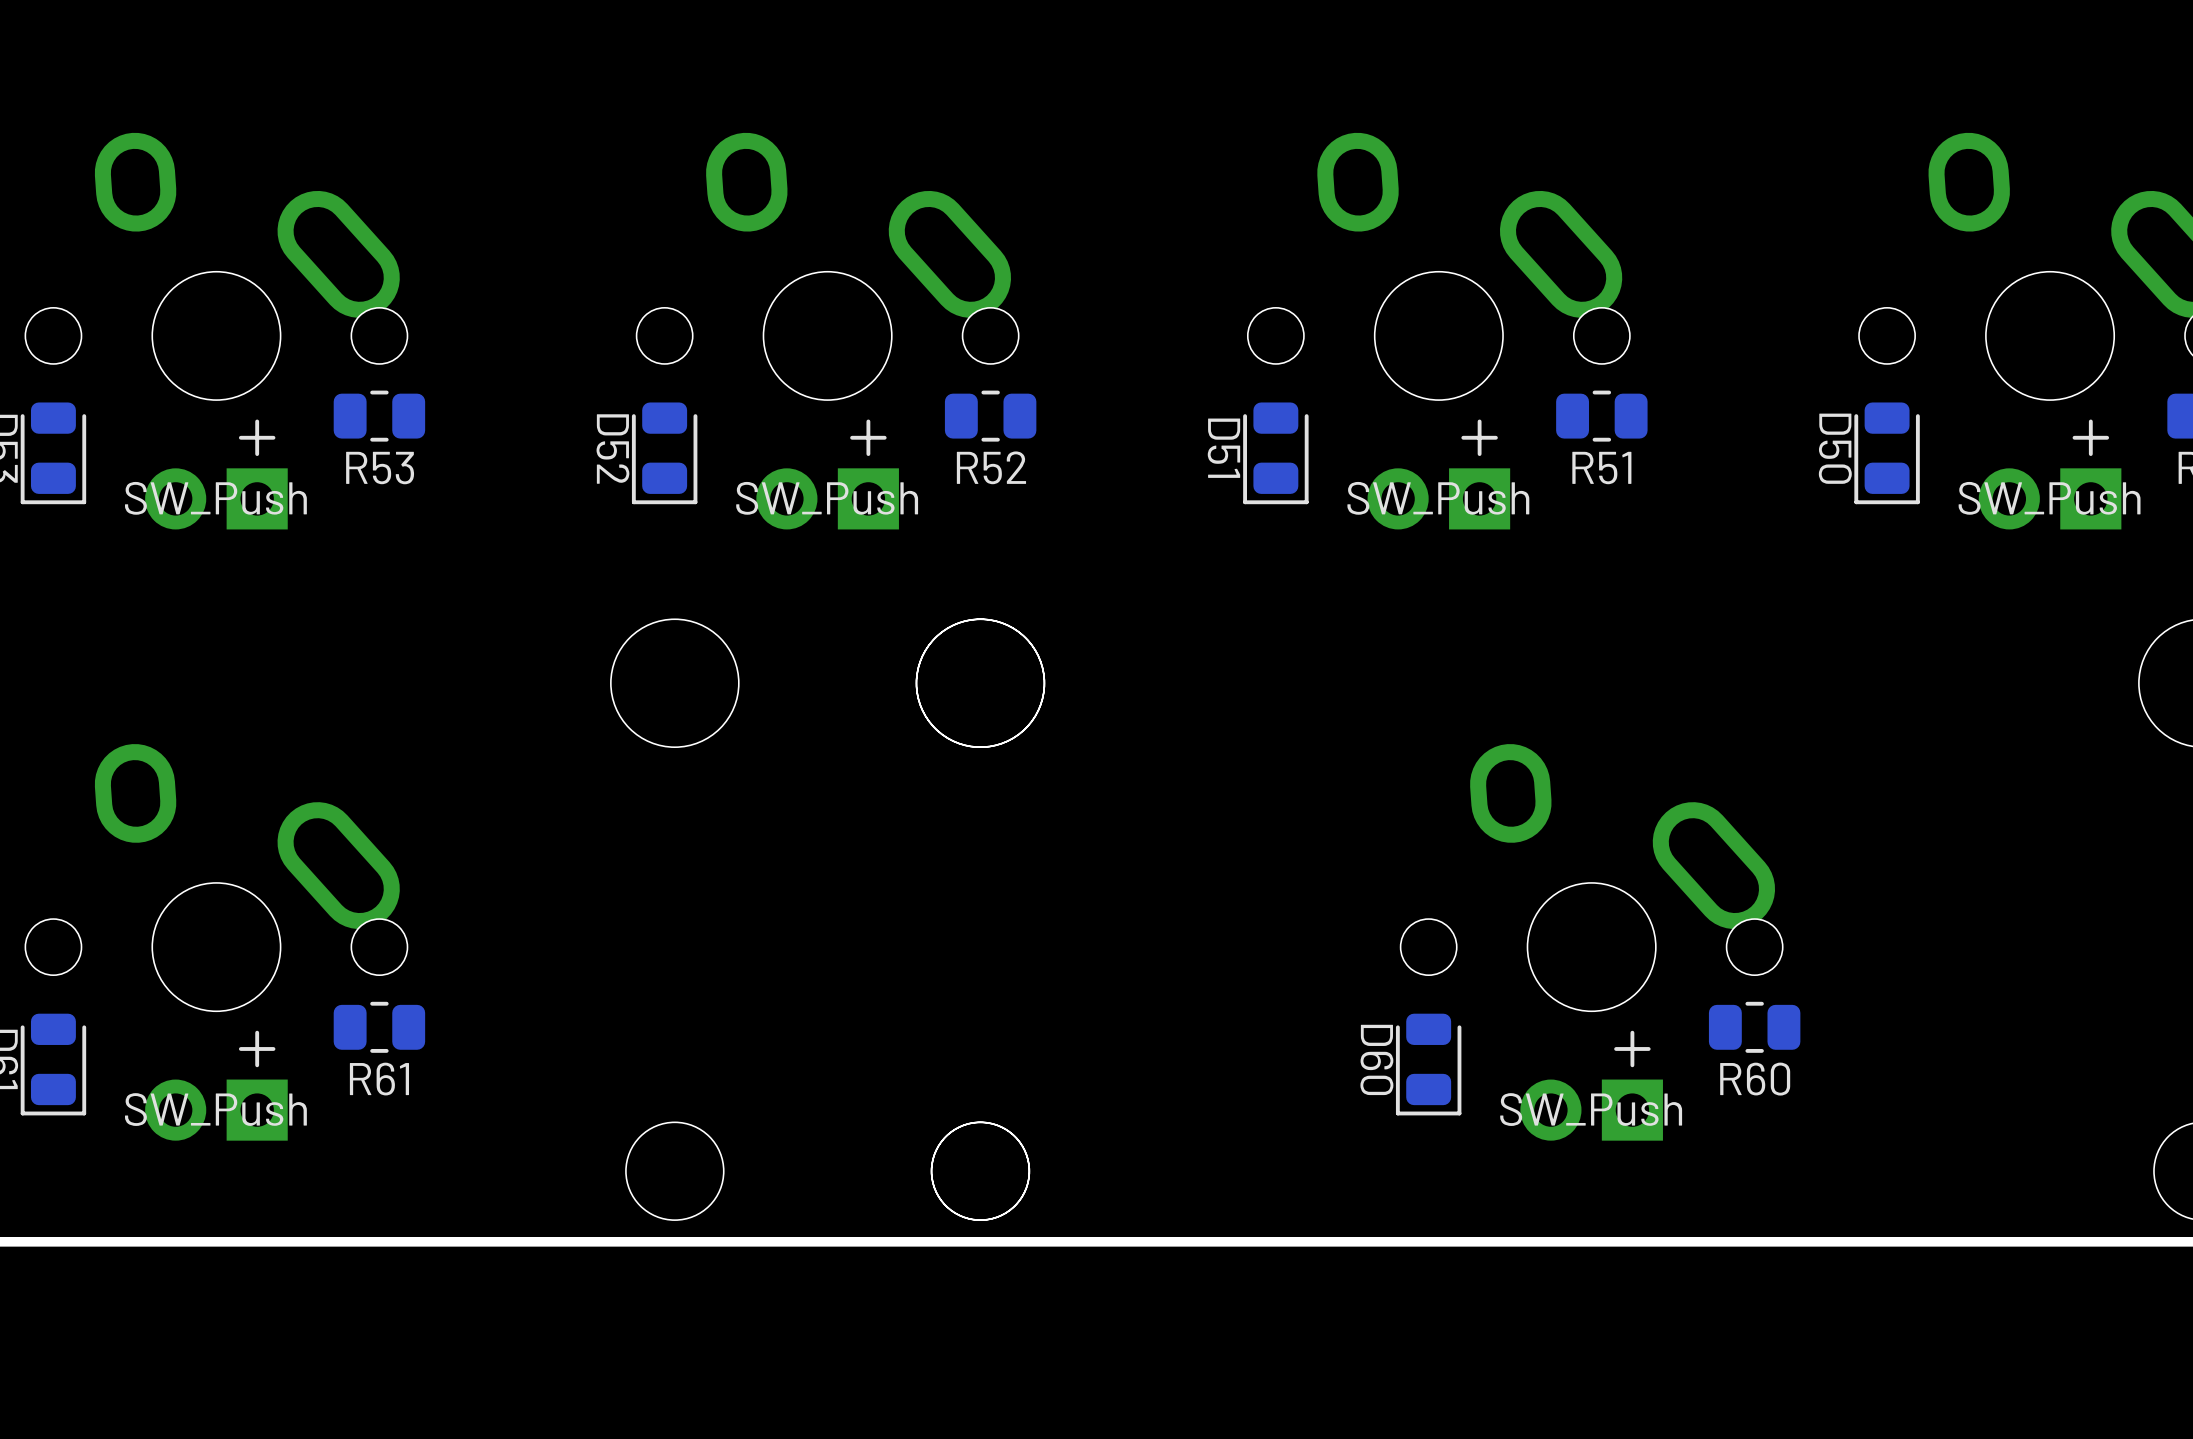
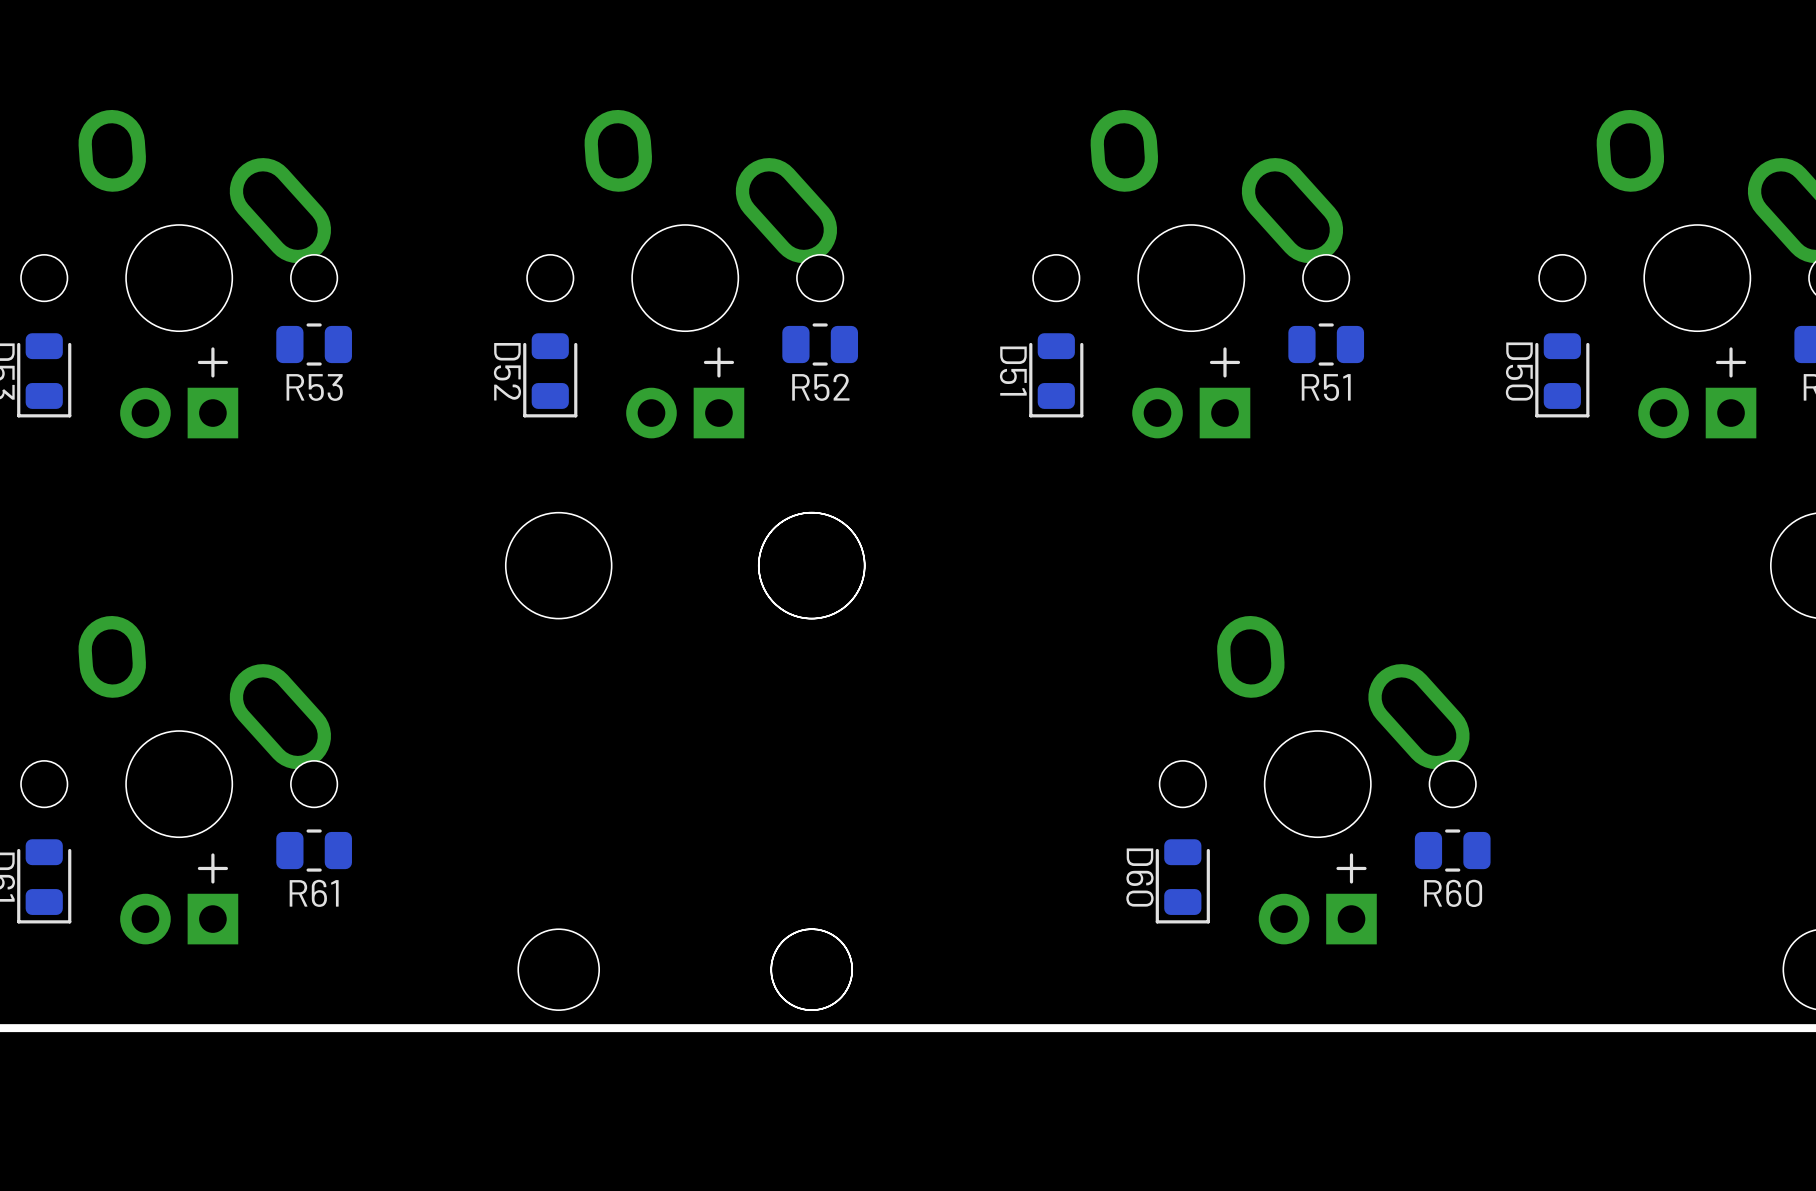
part value: SW_Push (215, 498) -> none
part value: SW_Push (827, 498) -> none
part value: SW_Push (1438, 498) -> none
part value: SW_Push (2049, 498) -> none
part value: SW_Push (215, 1109) -> none
part value: SW_Push (1591, 1109) -> none

